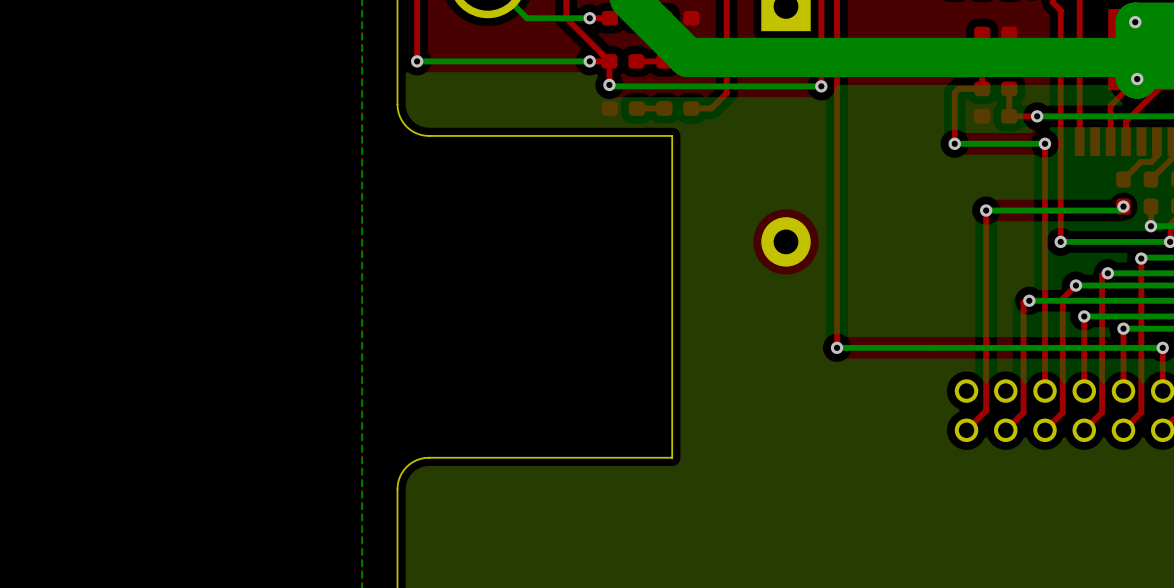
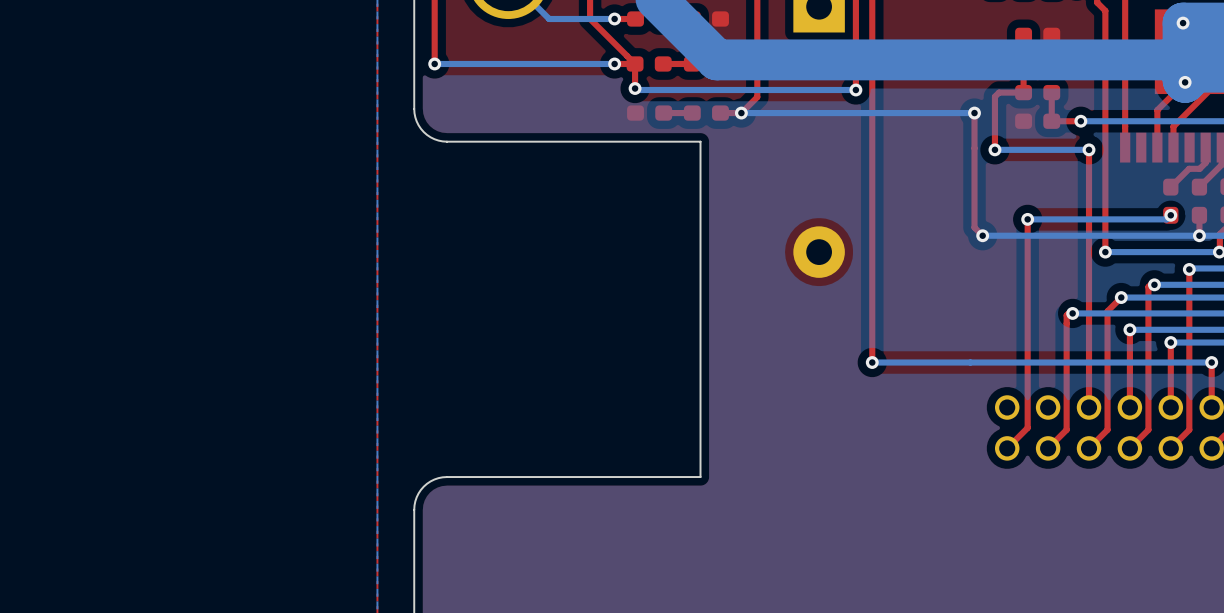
via: none -> (741, 113)
top track: none -> (974, 113) (974, 227) (982, 235)
bottom track: none -> (974, 113) (741, 113)
via: none -> (974, 113)
via: none -> (982, 235)
bottom track: none -> (1199, 235) (982, 235)

